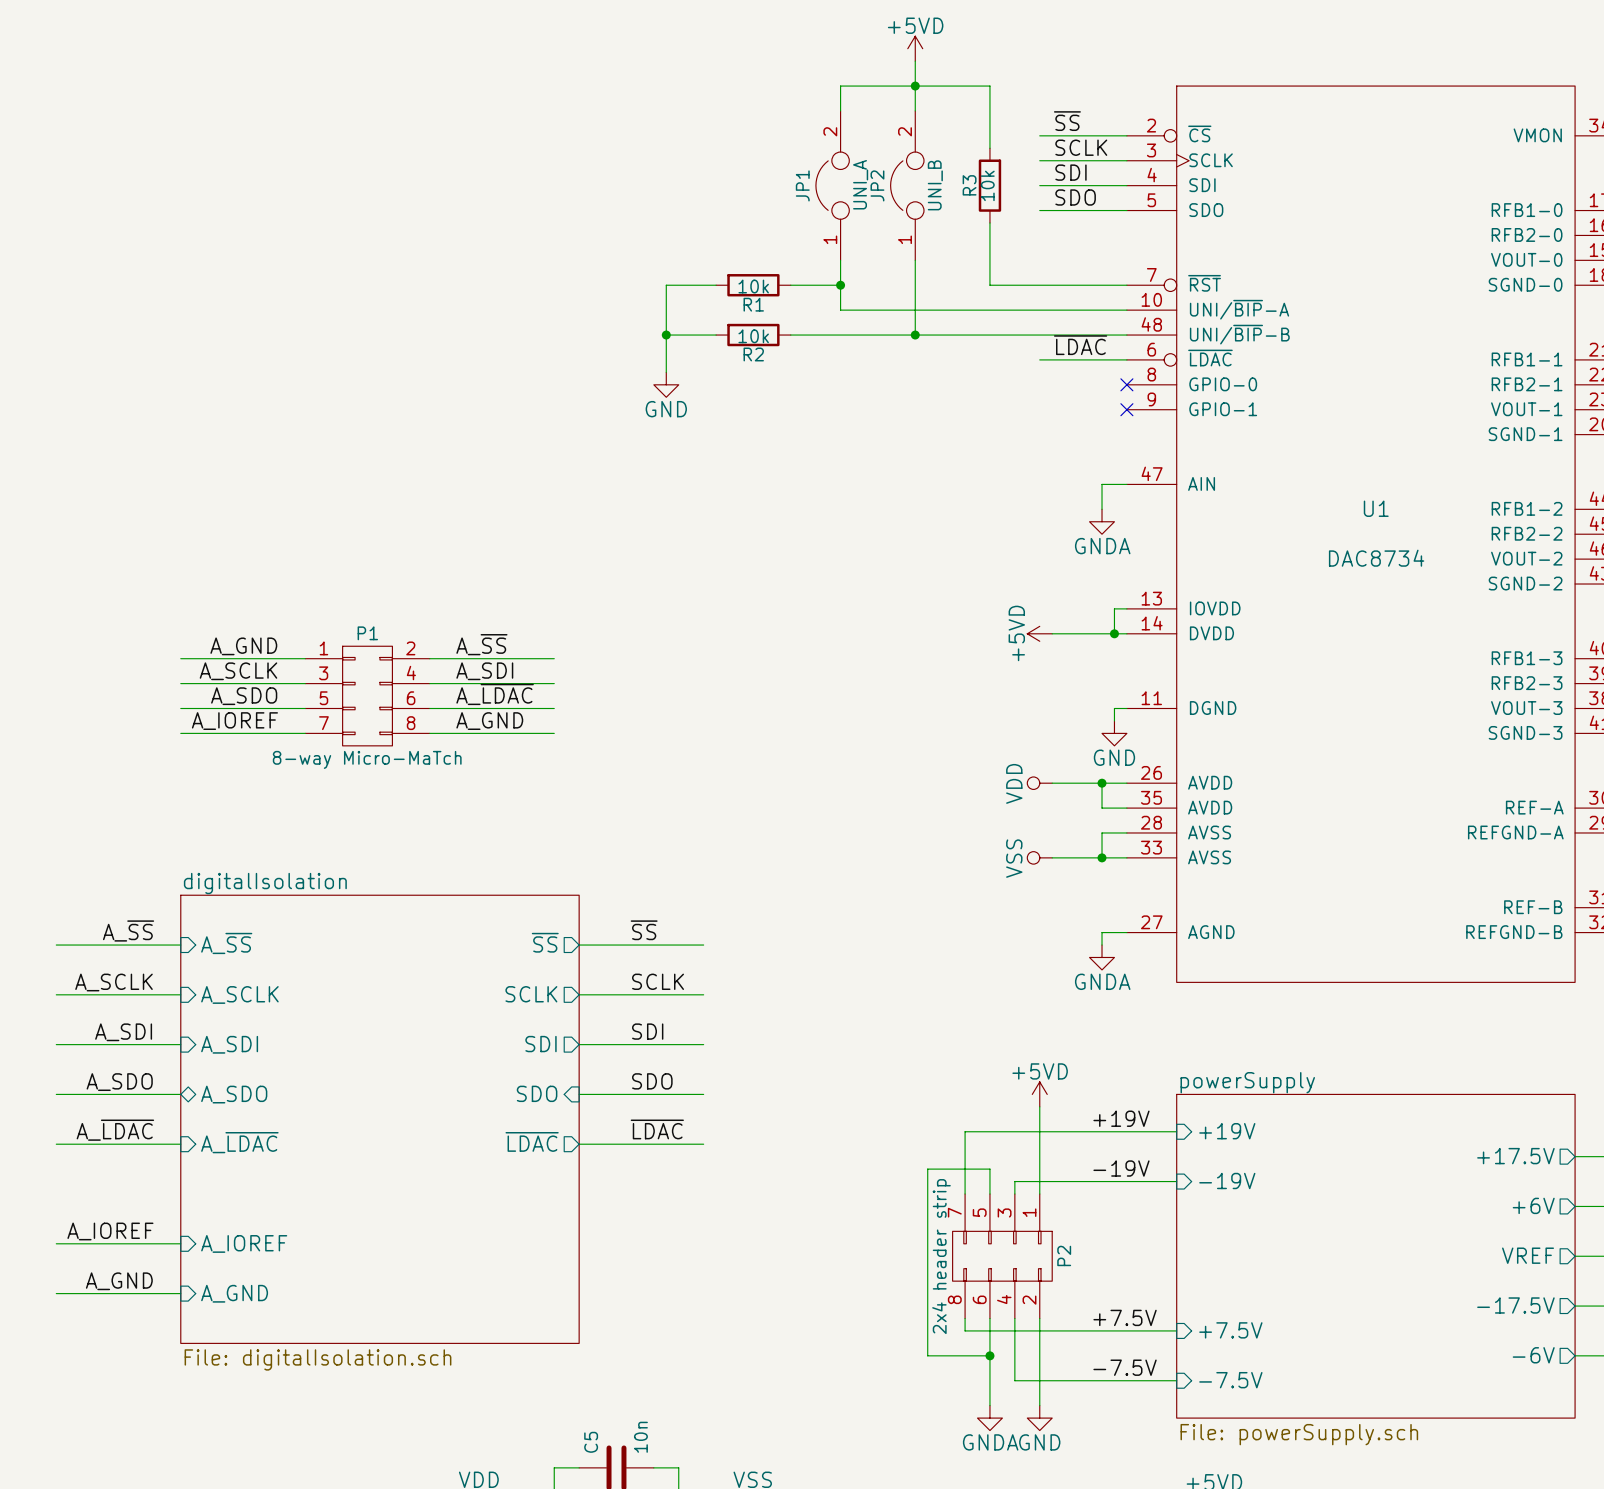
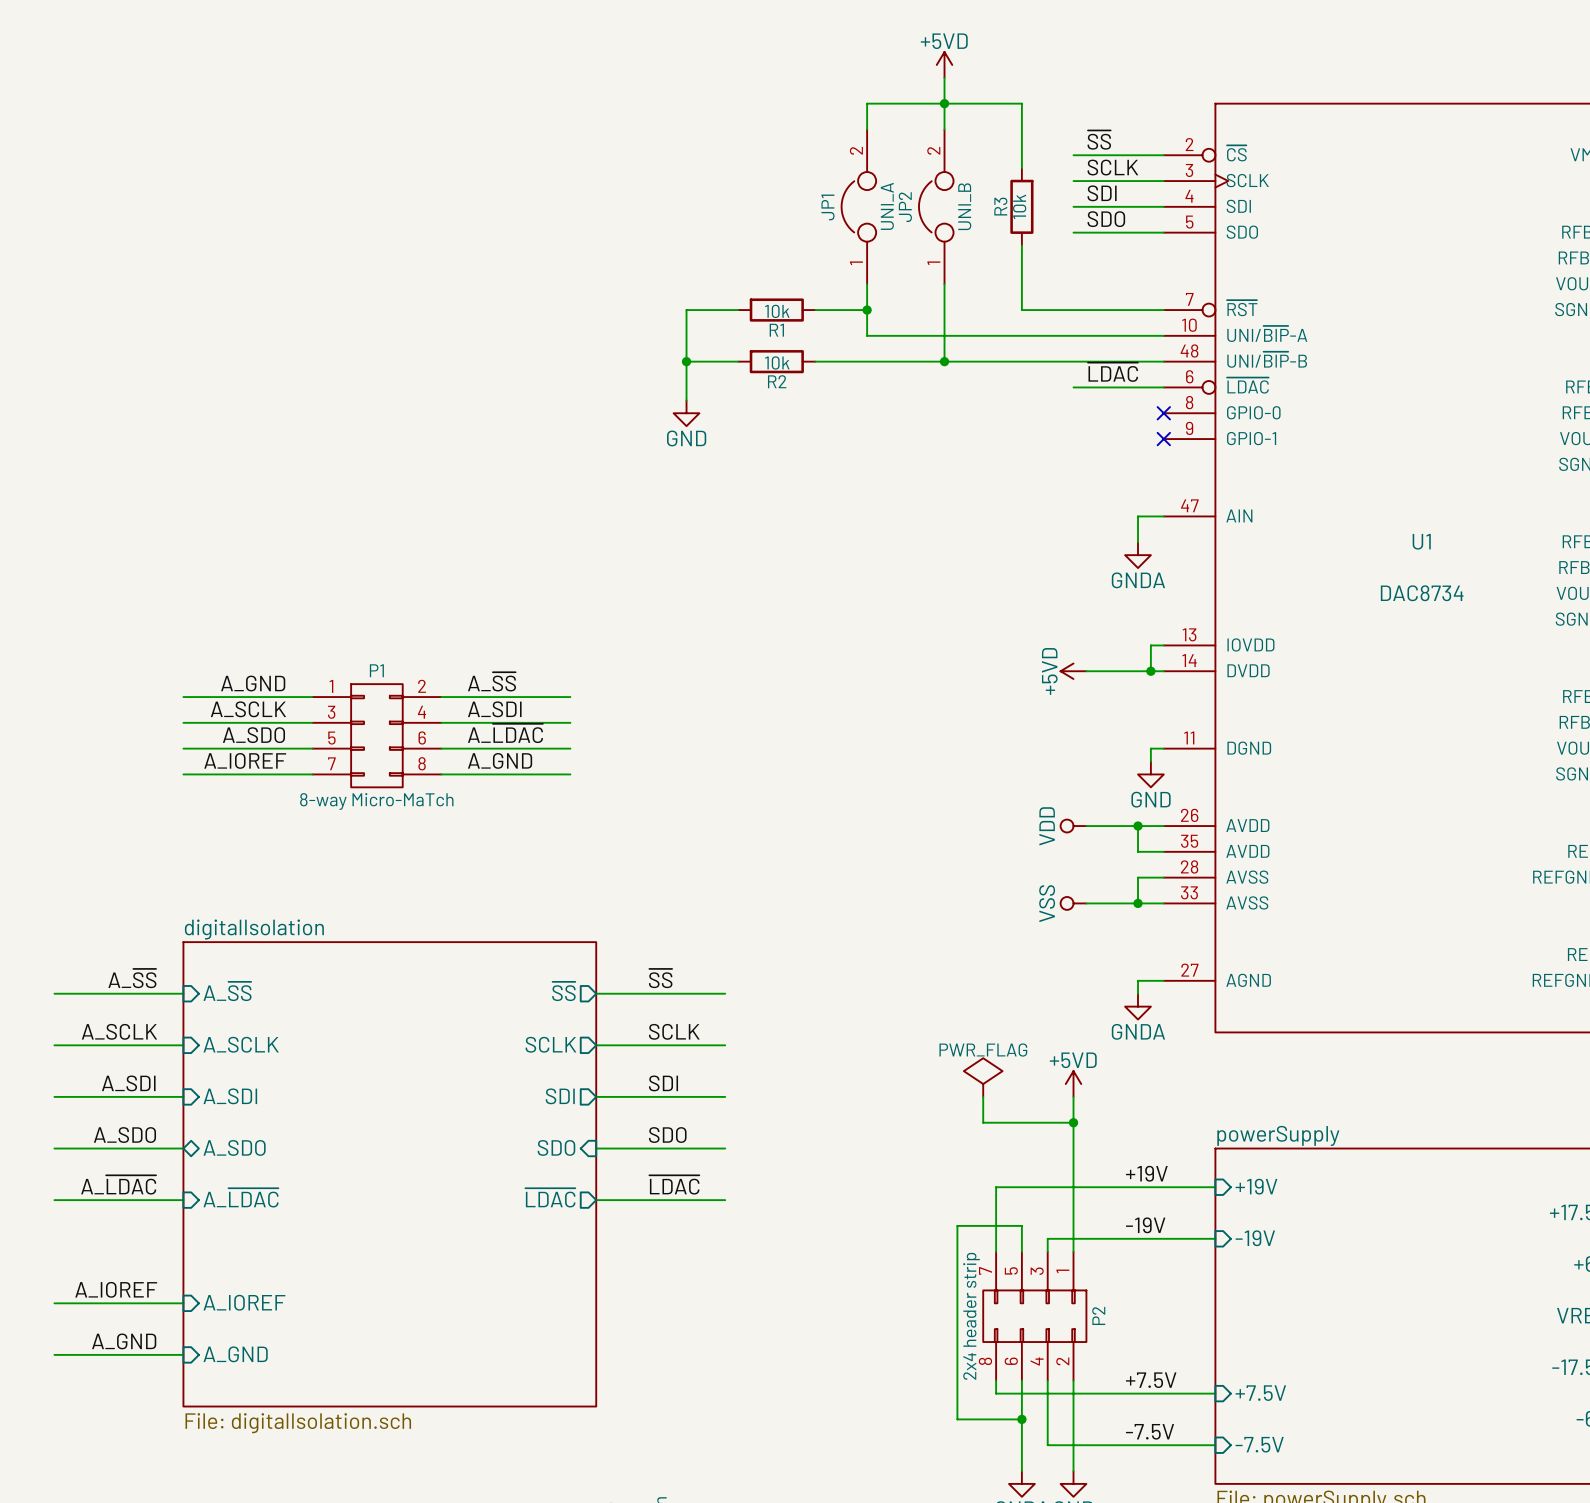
power symbol: none -> PWR_FLAG (983, 1077)
wire: none -> (983, 1096) (983, 1122) (1073, 1122)
wire: none -> (1073, 1096) (1073, 1161)
junction: none -> (1073, 1122)
power symbol position: +5VD (1039, 1094) -> +5VD (1073, 1084)

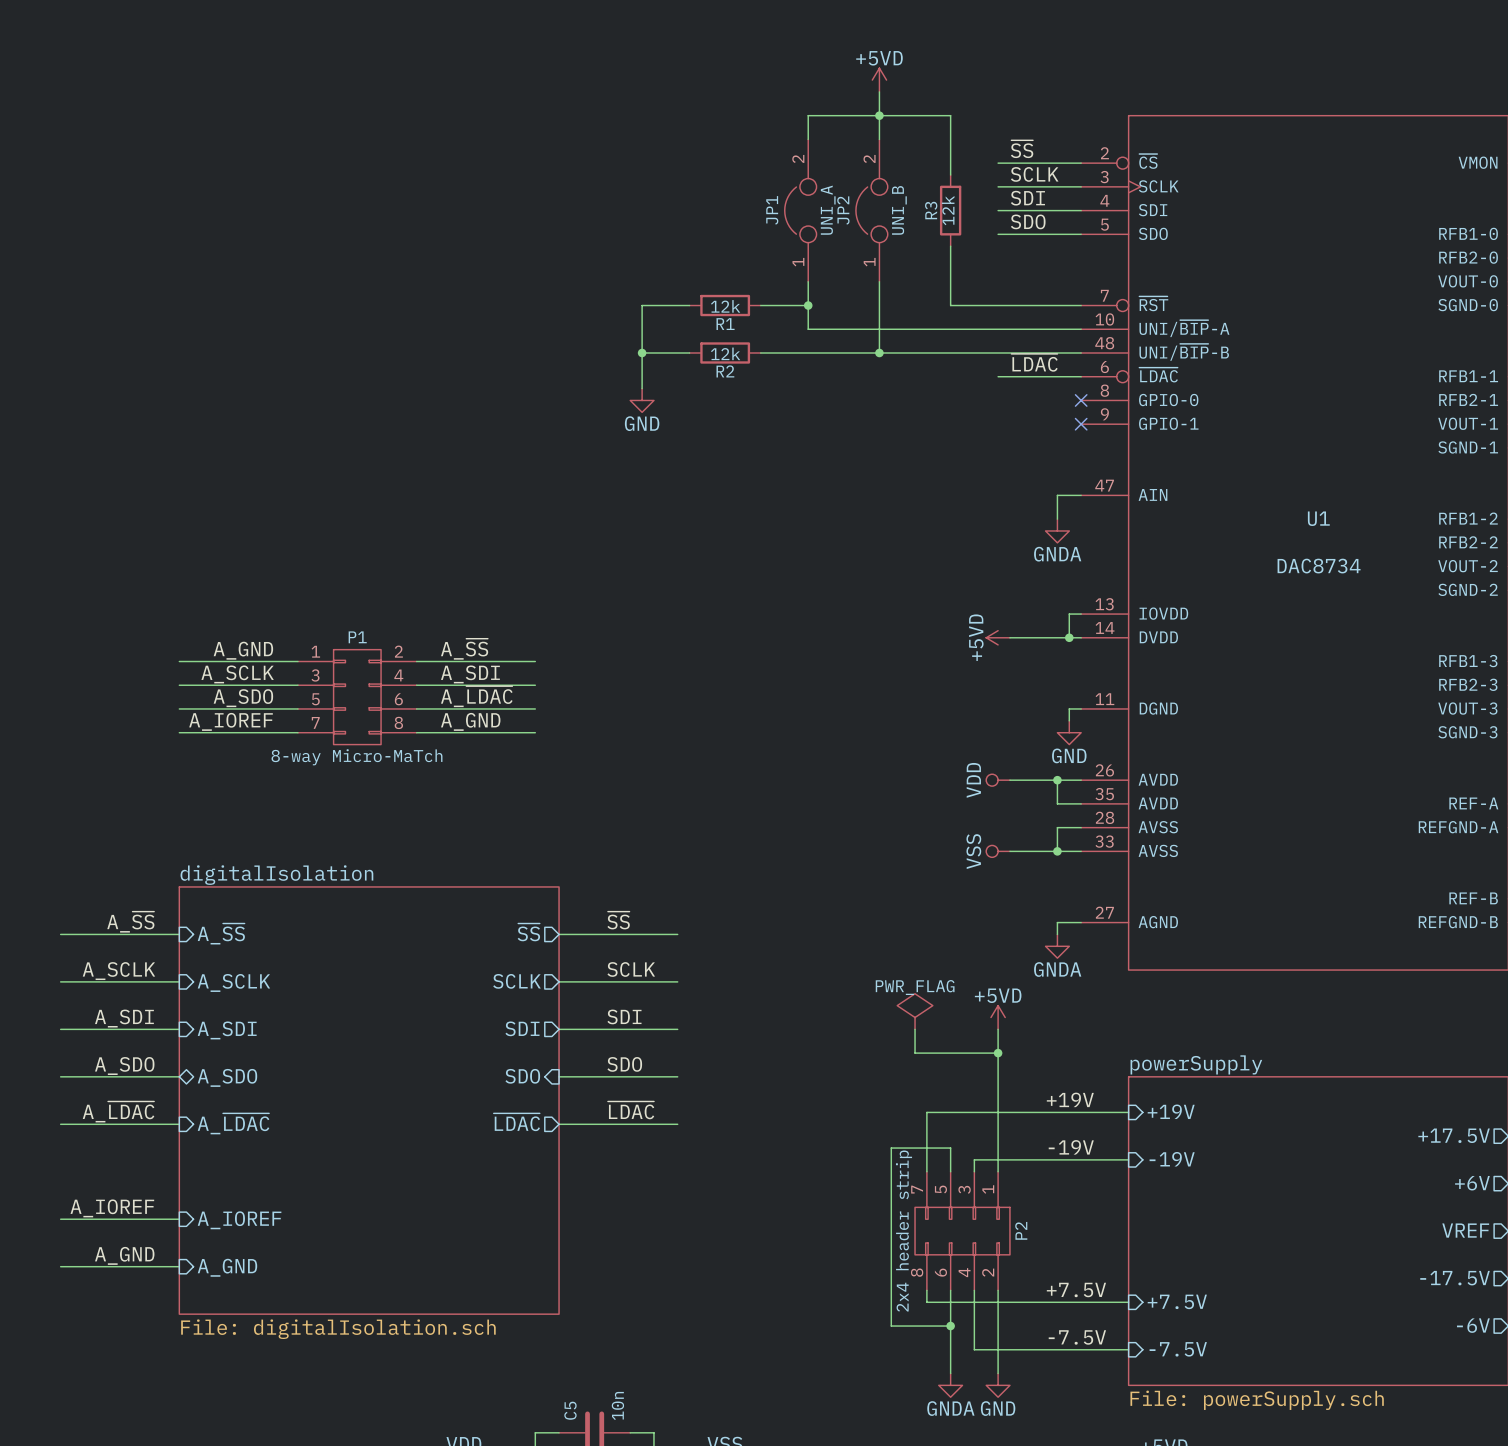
R3 value: 10k (1019, 206) -> 12k (948, 210)
R1 value: 10k (777, 311) -> 12k (725, 306)
R2 value: 10k (777, 362) -> 12k (725, 353)

